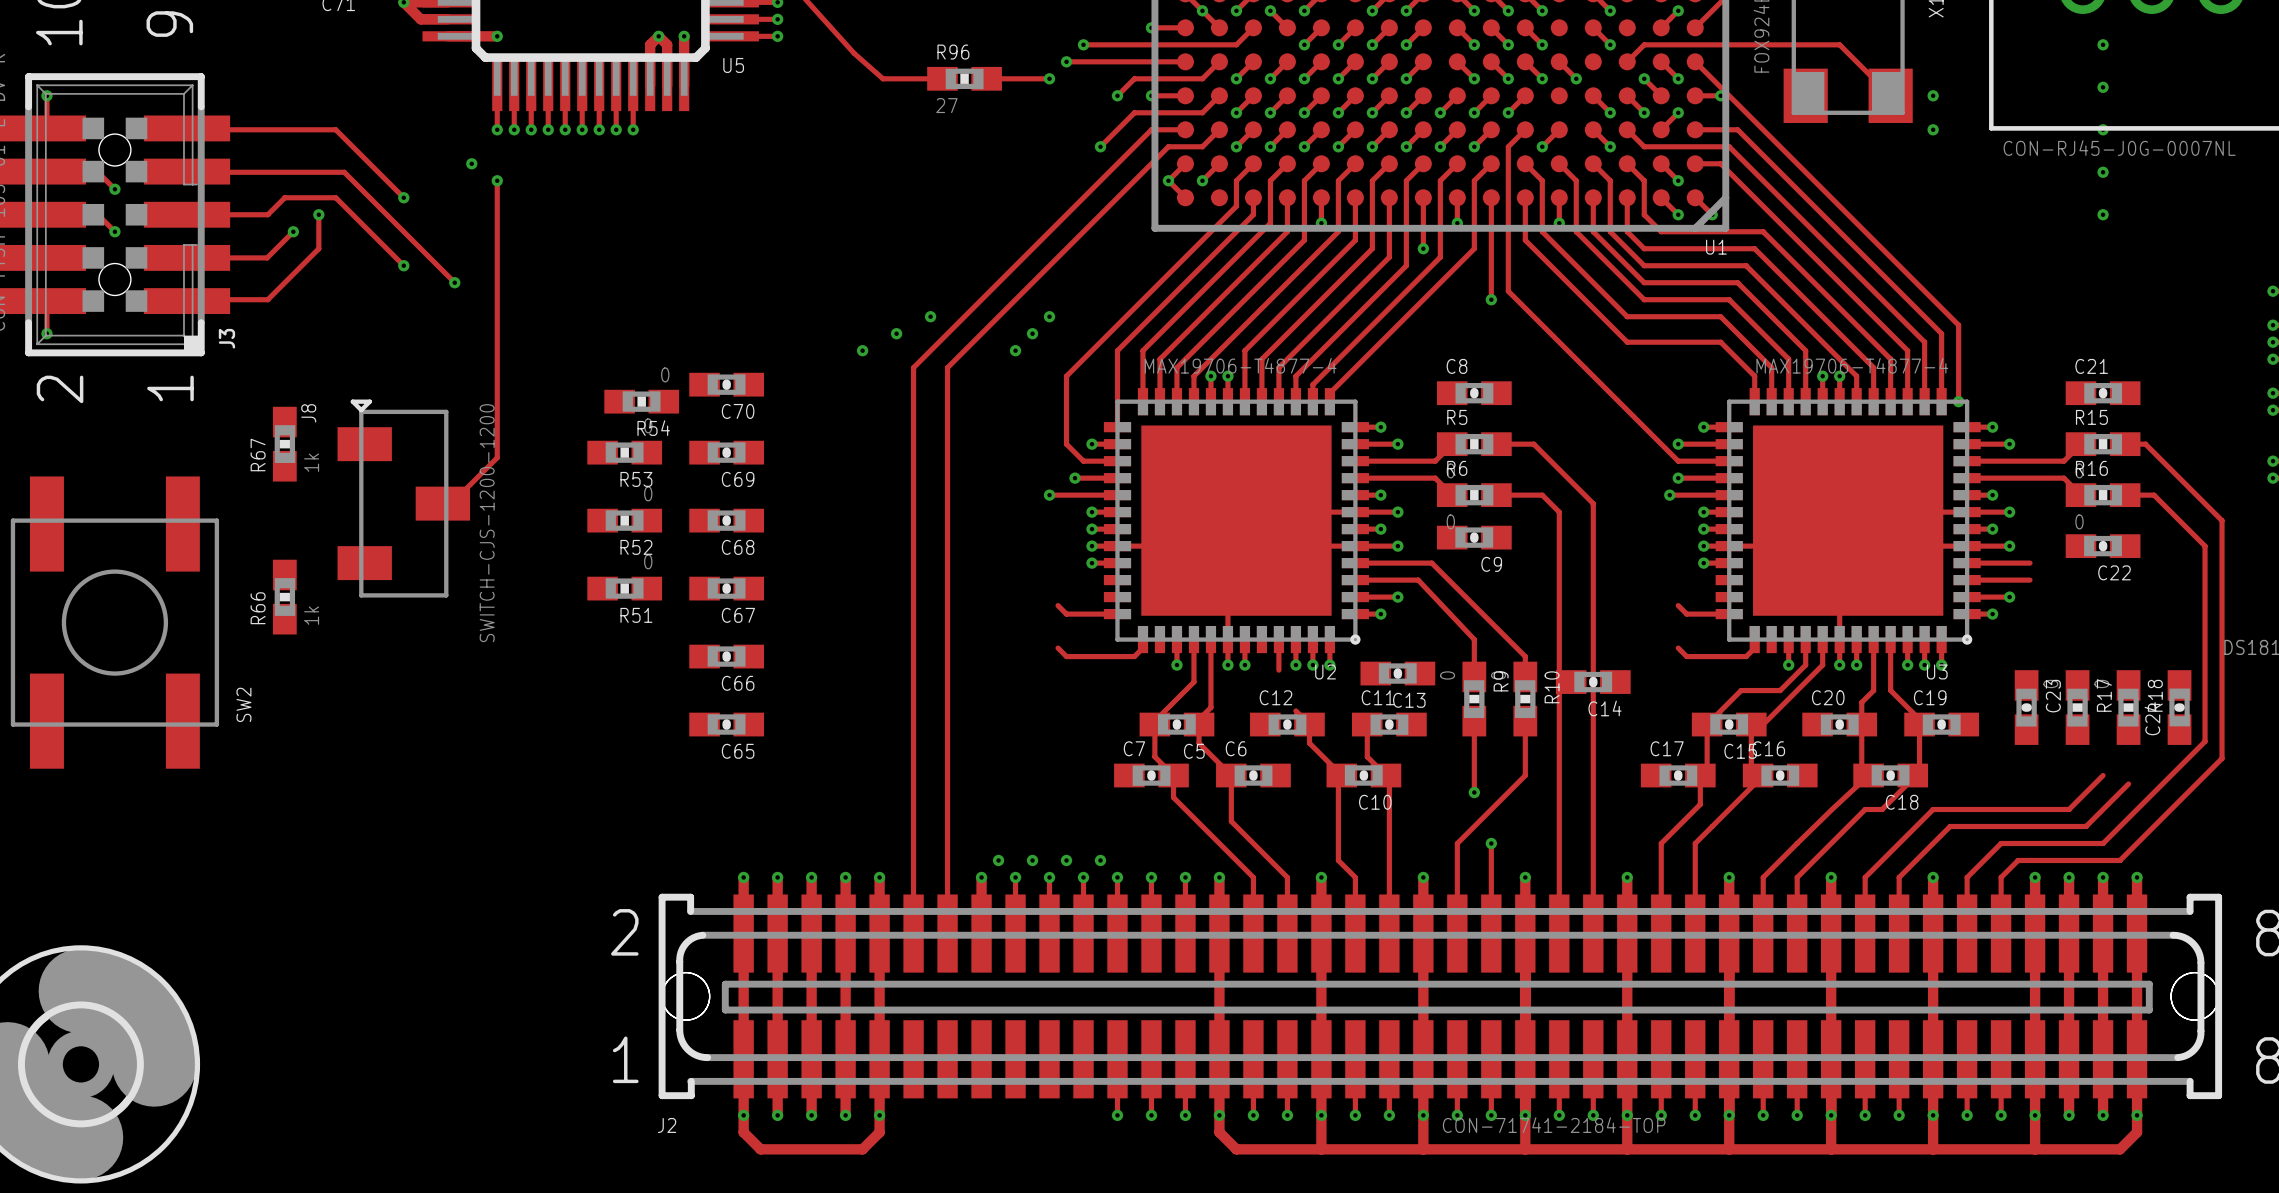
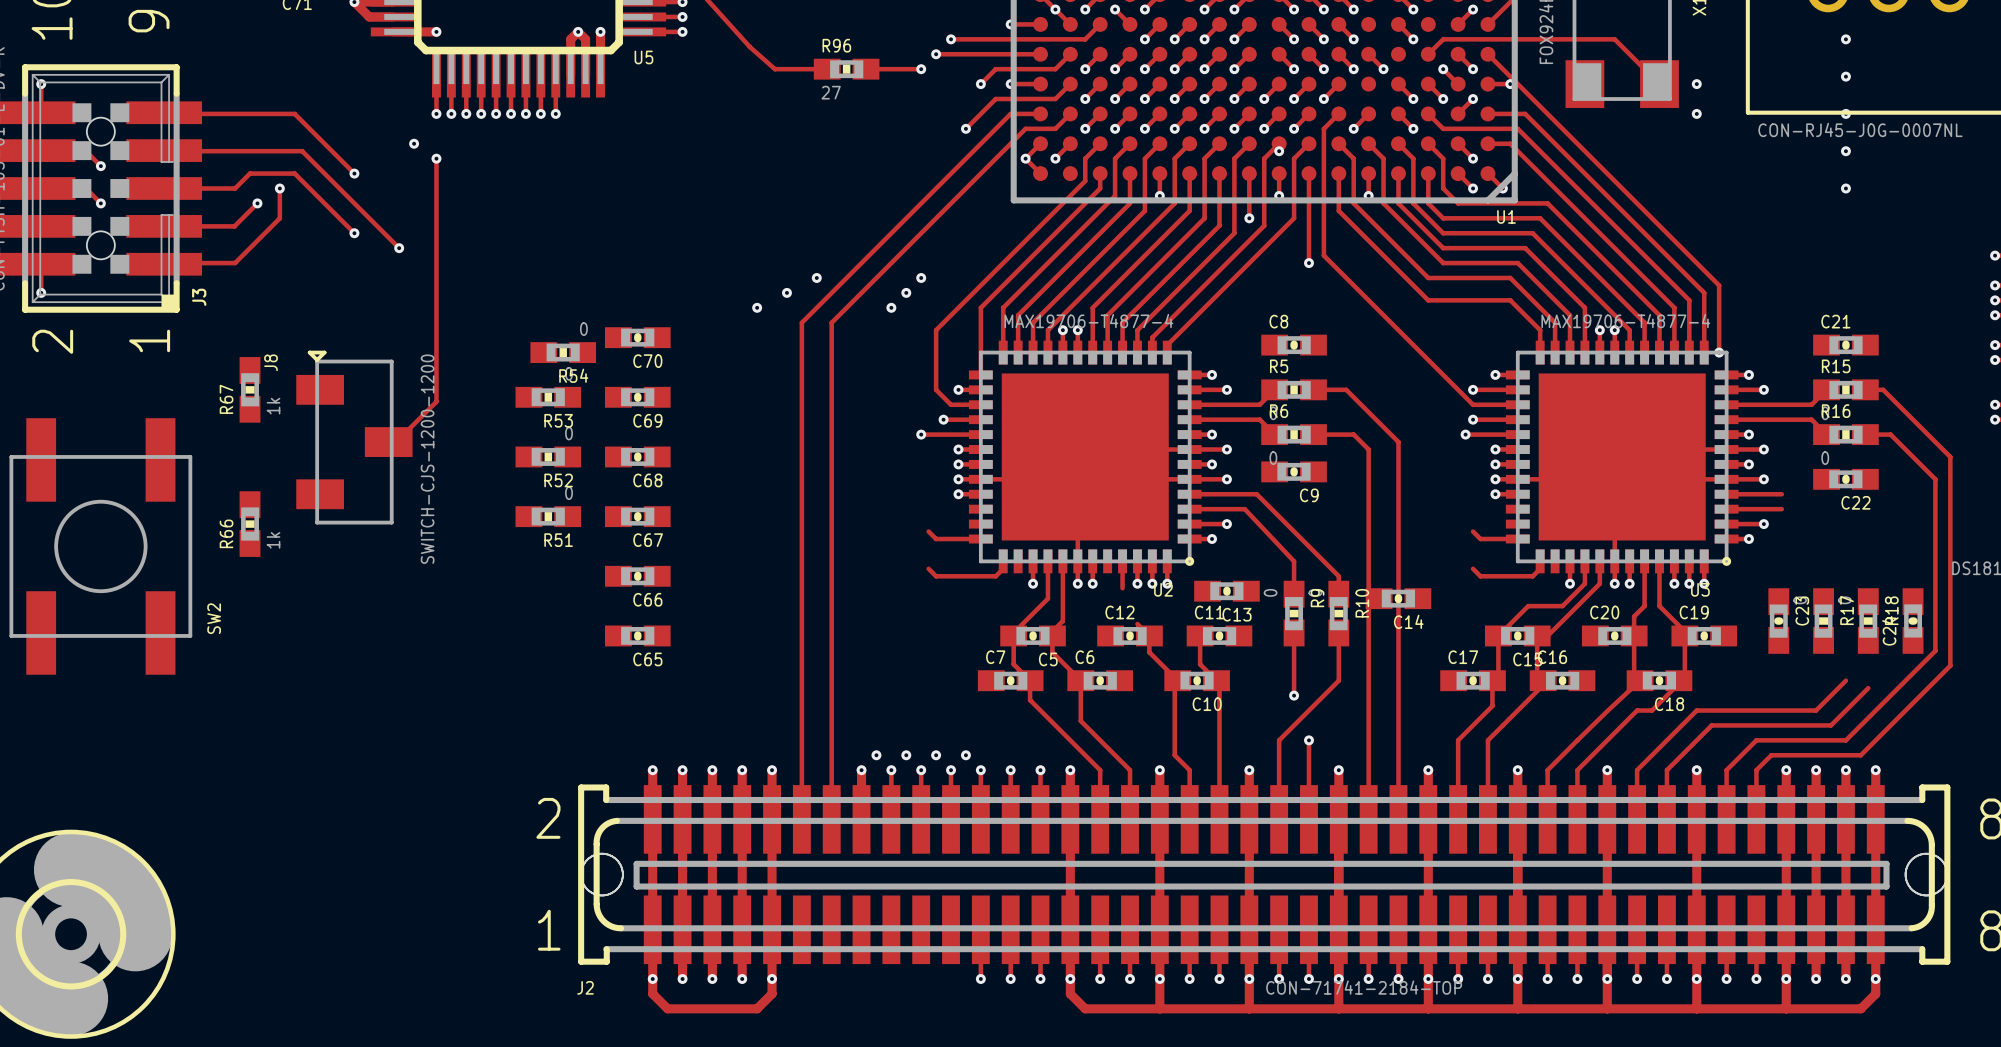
via: none -> (1279, 151)

